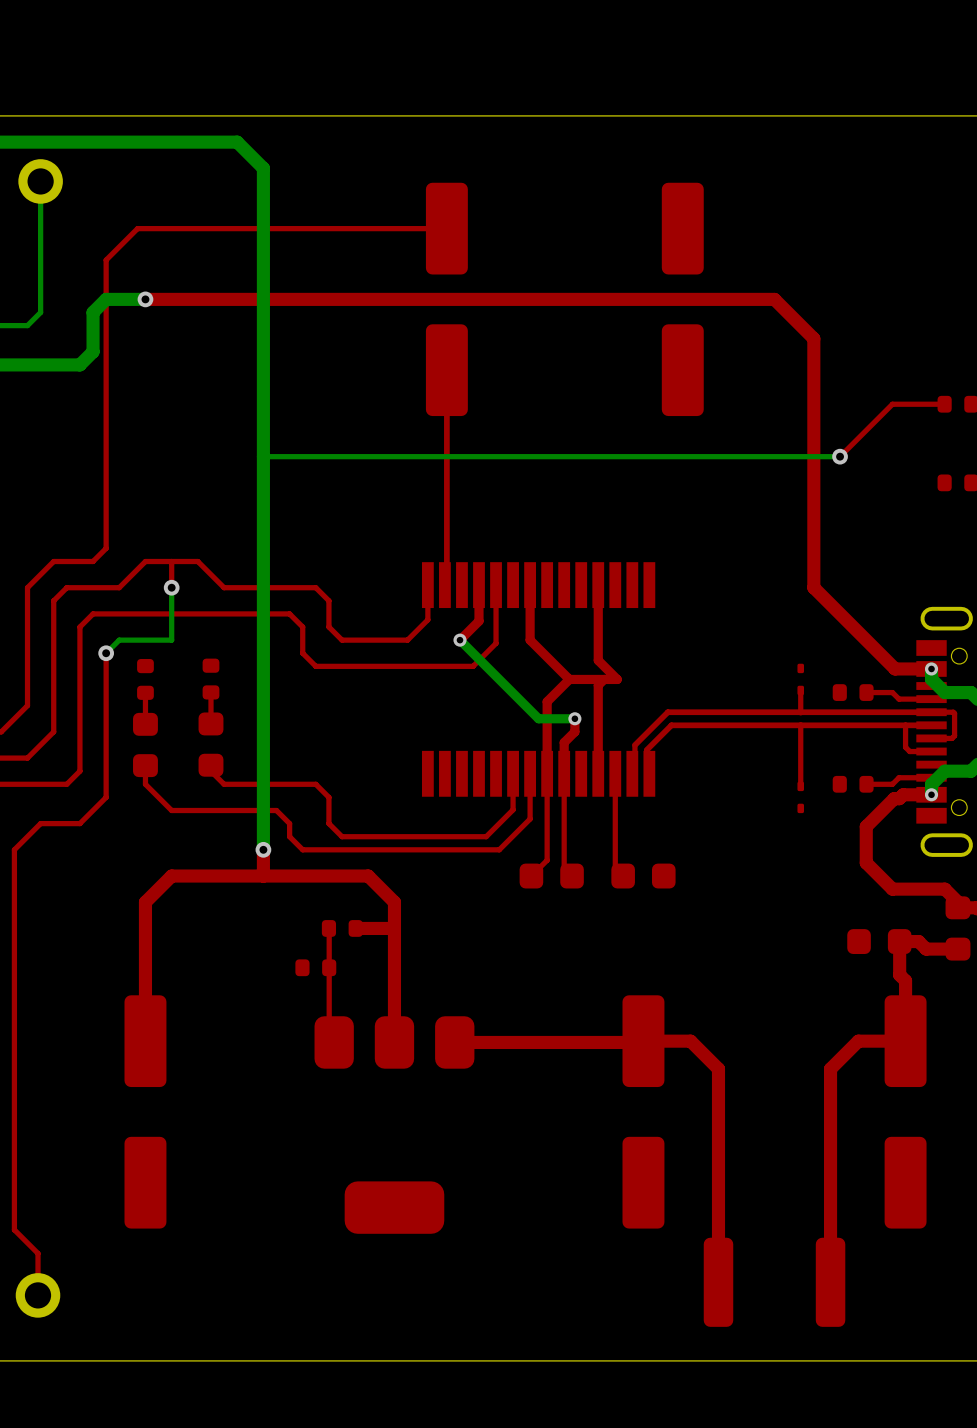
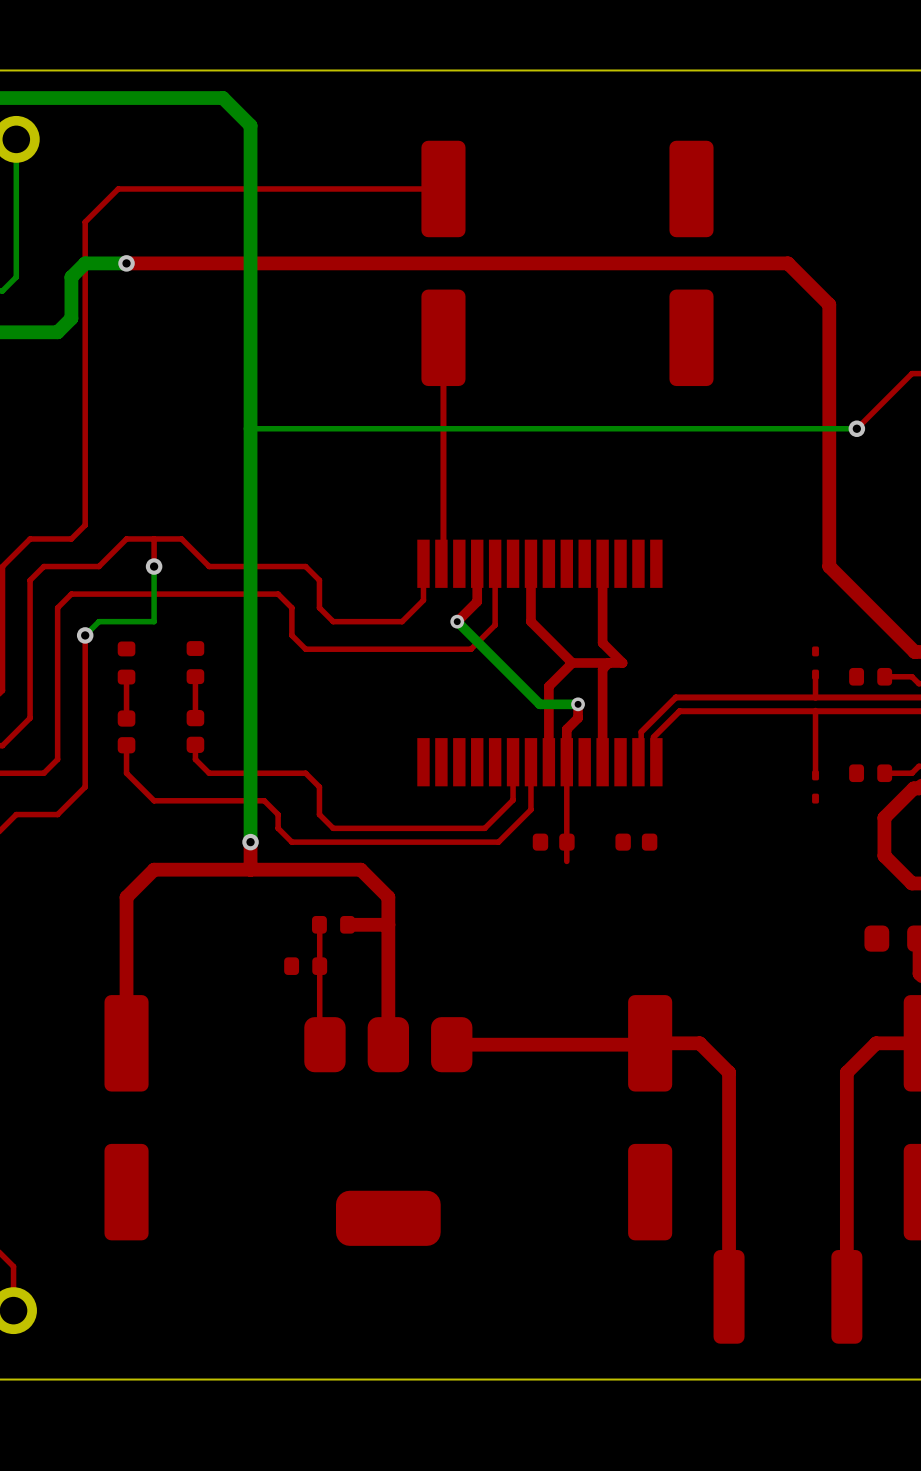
part footprint: [133, 712, 158, 778] -> [117, 710, 136, 754]
part footprint: [198, 712, 224, 777] -> [186, 709, 205, 753]
top track: (547, 773) (547, 860) (531, 876) -> none
top track: (615, 773) (615, 868) (623, 876) -> none
part: none -> (636, 842)
part footprint: [519, 863, 584, 889] -> [532, 833, 575, 851]
part: (643, 876) -> none

